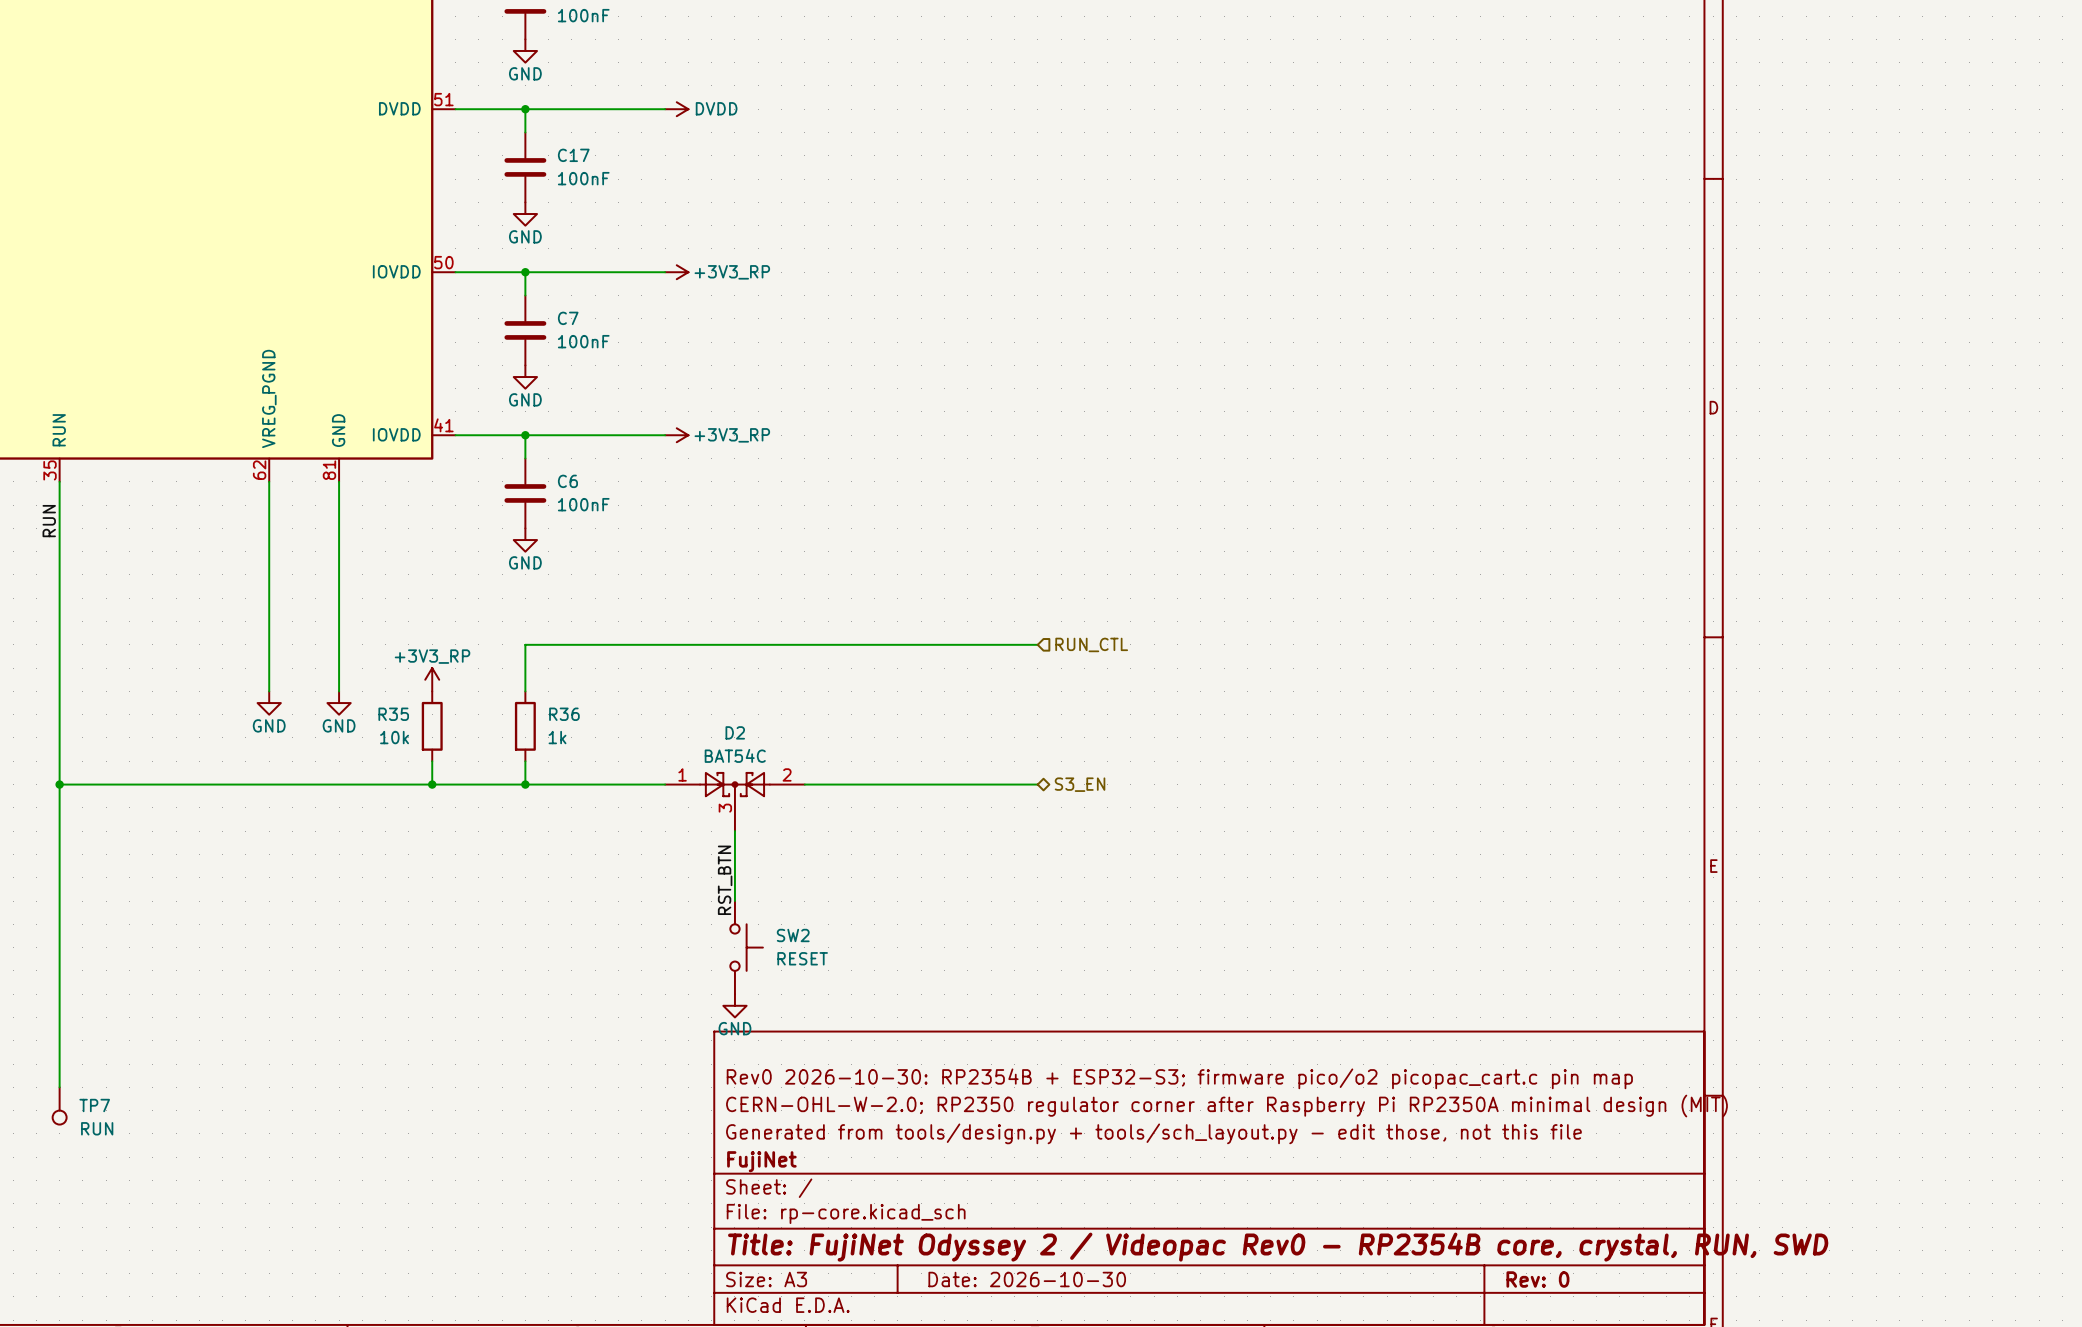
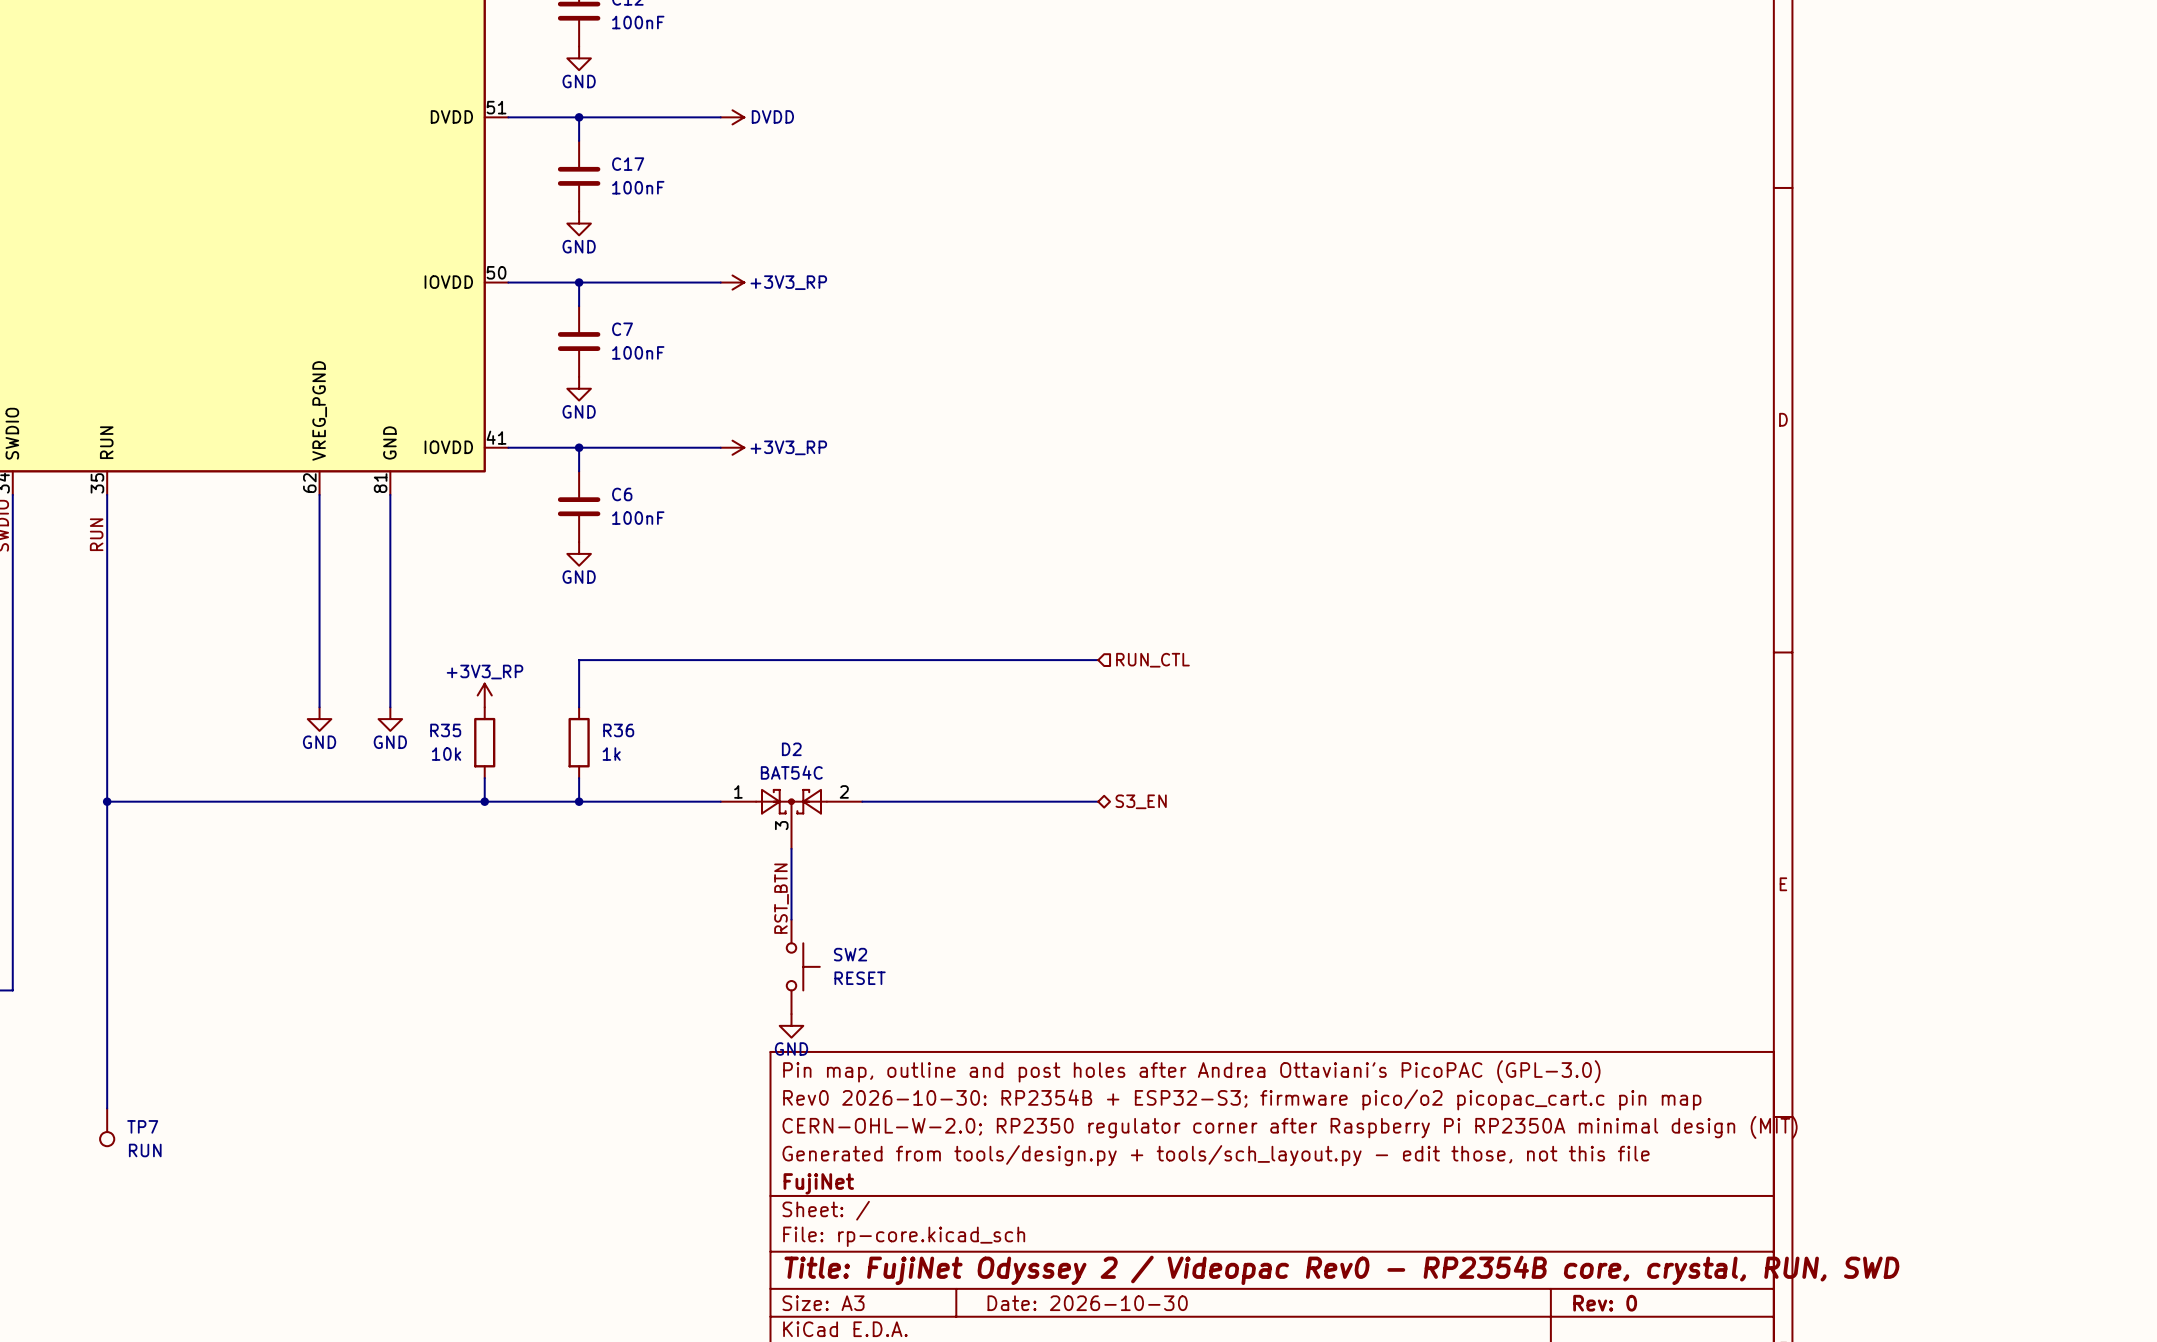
title block: none -> Pin map, outline and post holes after Andrea Ottaviani's PicoPAC (GPL-3.0) (1191, 1071)

